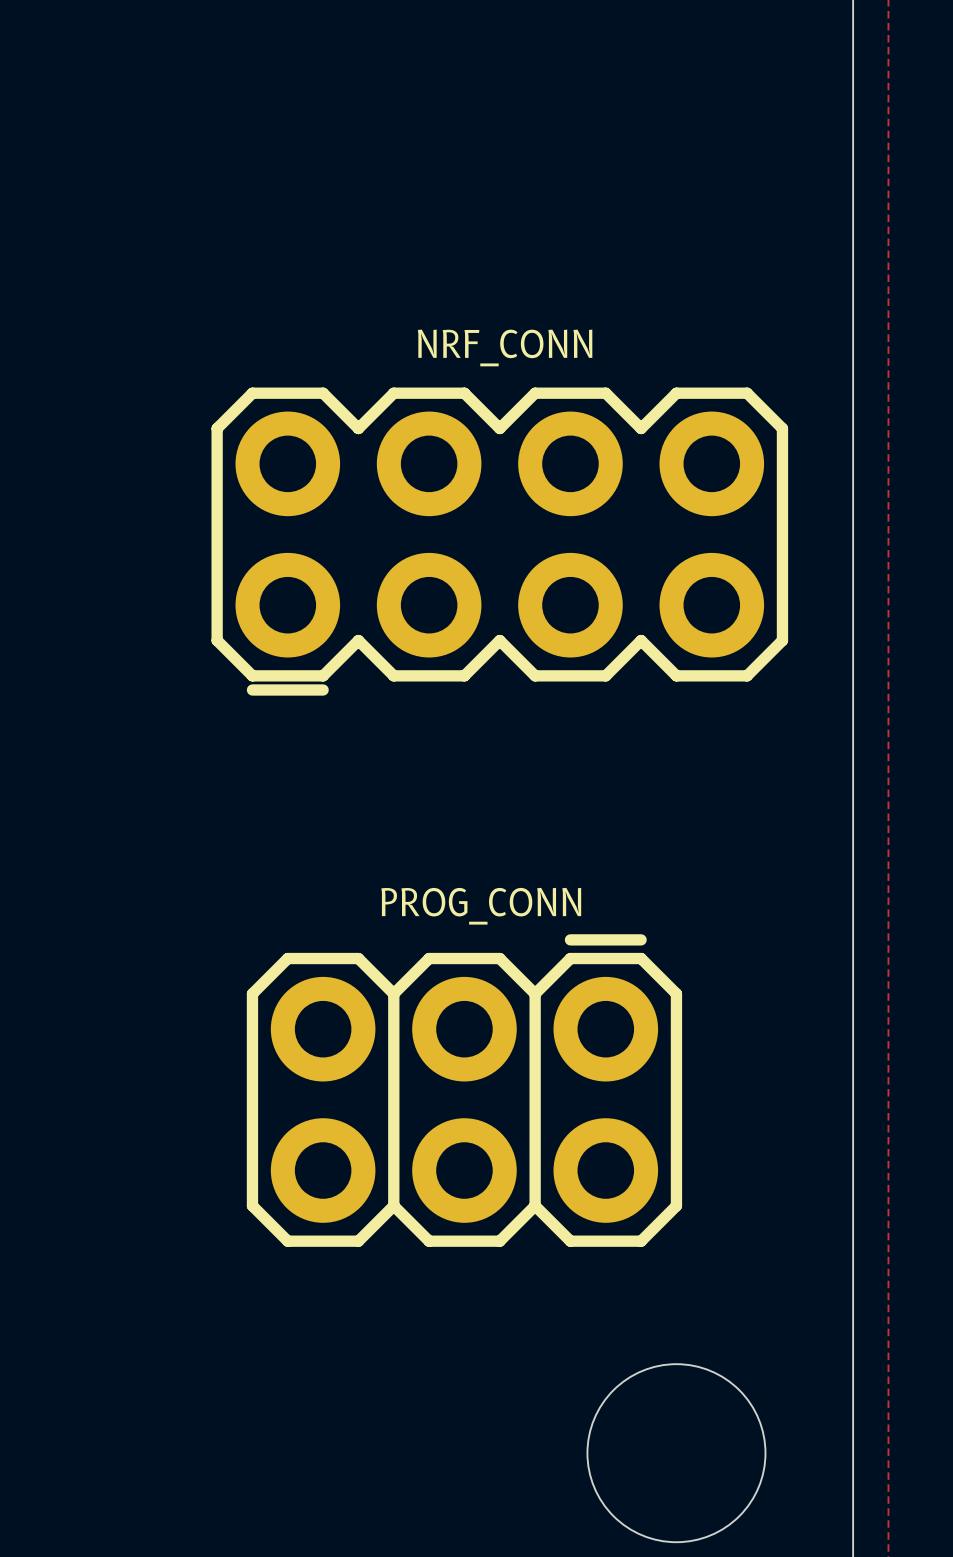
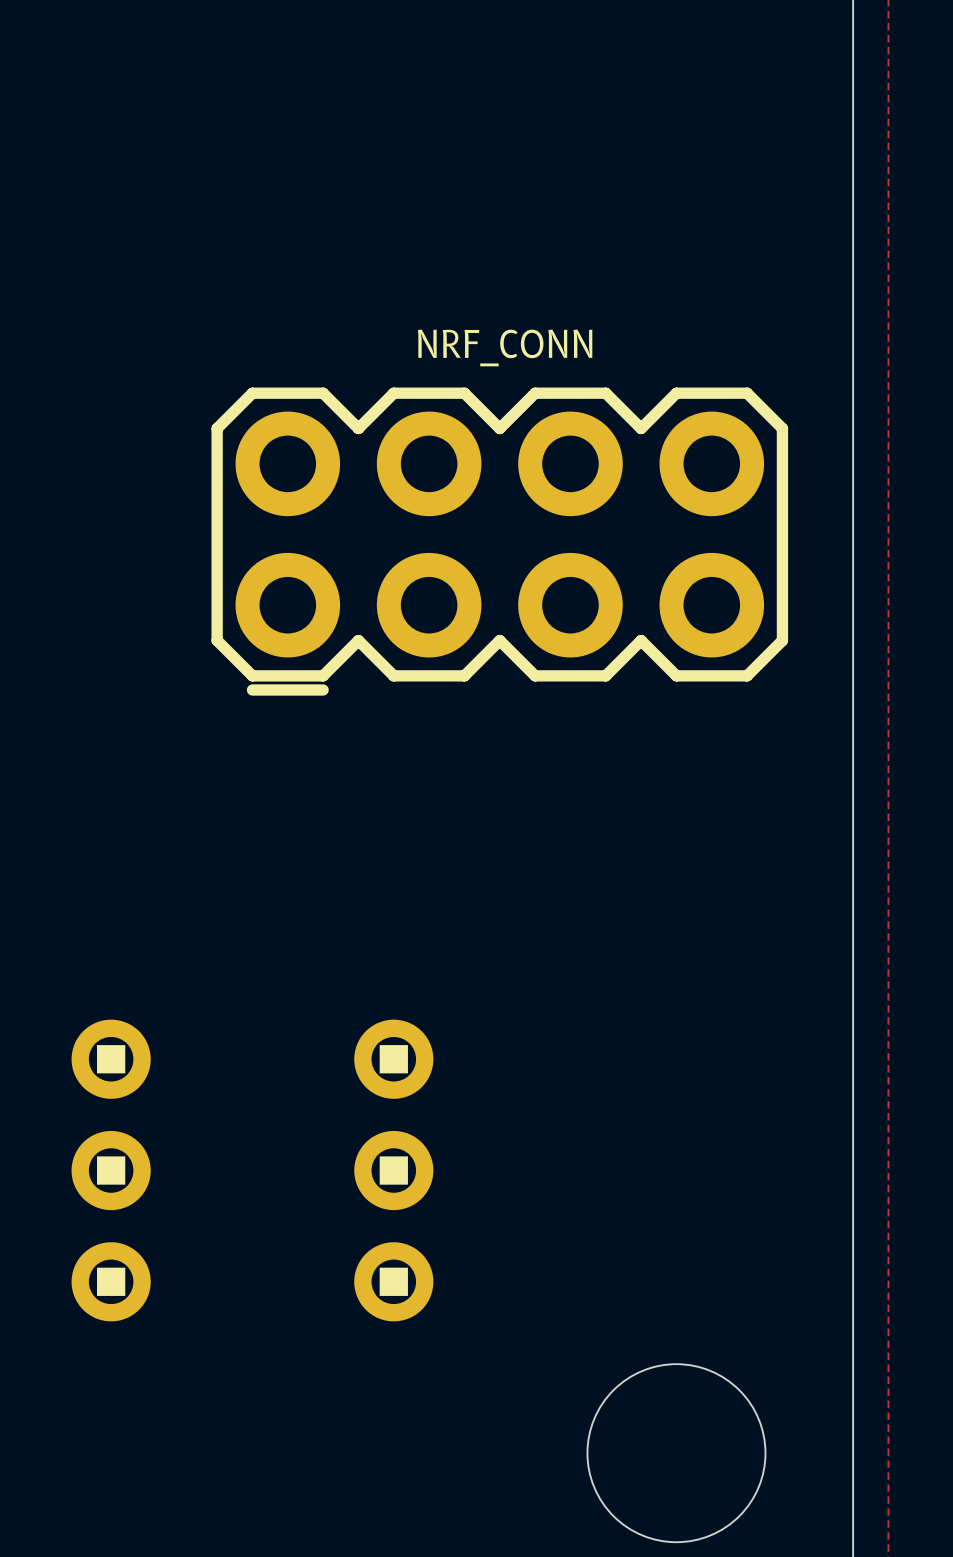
PROG_CONN: (464, 1090) -> none
part: none -> (111, 1170)
part: none -> (393, 1170)

